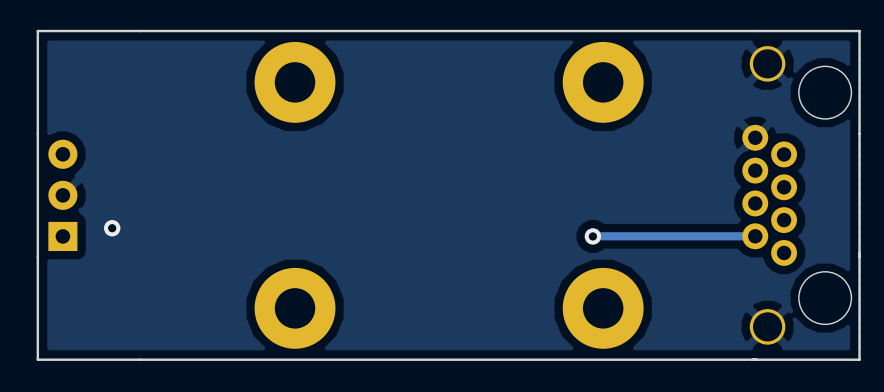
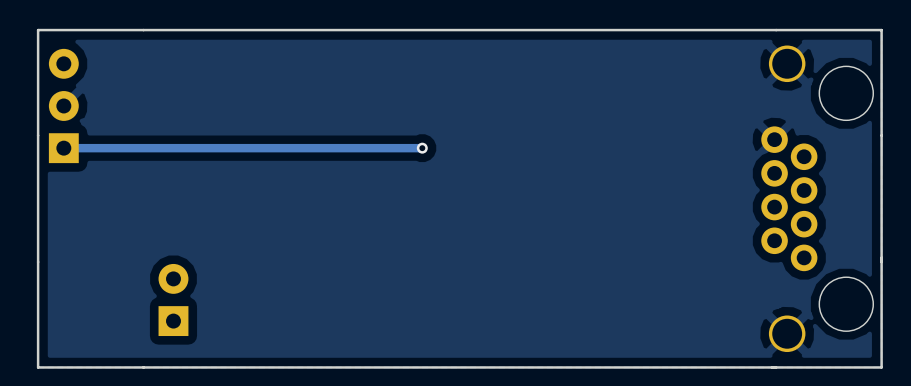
part: (295, 82) -> none
part: (603, 82) -> none
track: none -> (422, 148) (63, 148)
via: none -> (422, 148)
part position: (62, 195) -> (63, 105)
via: (112, 228) -> none
via: (592, 236) -> none
track: (755, 236) (593, 236) -> none
part: none -> (173, 299)
part: (295, 308) -> none
part: (603, 308) -> none

